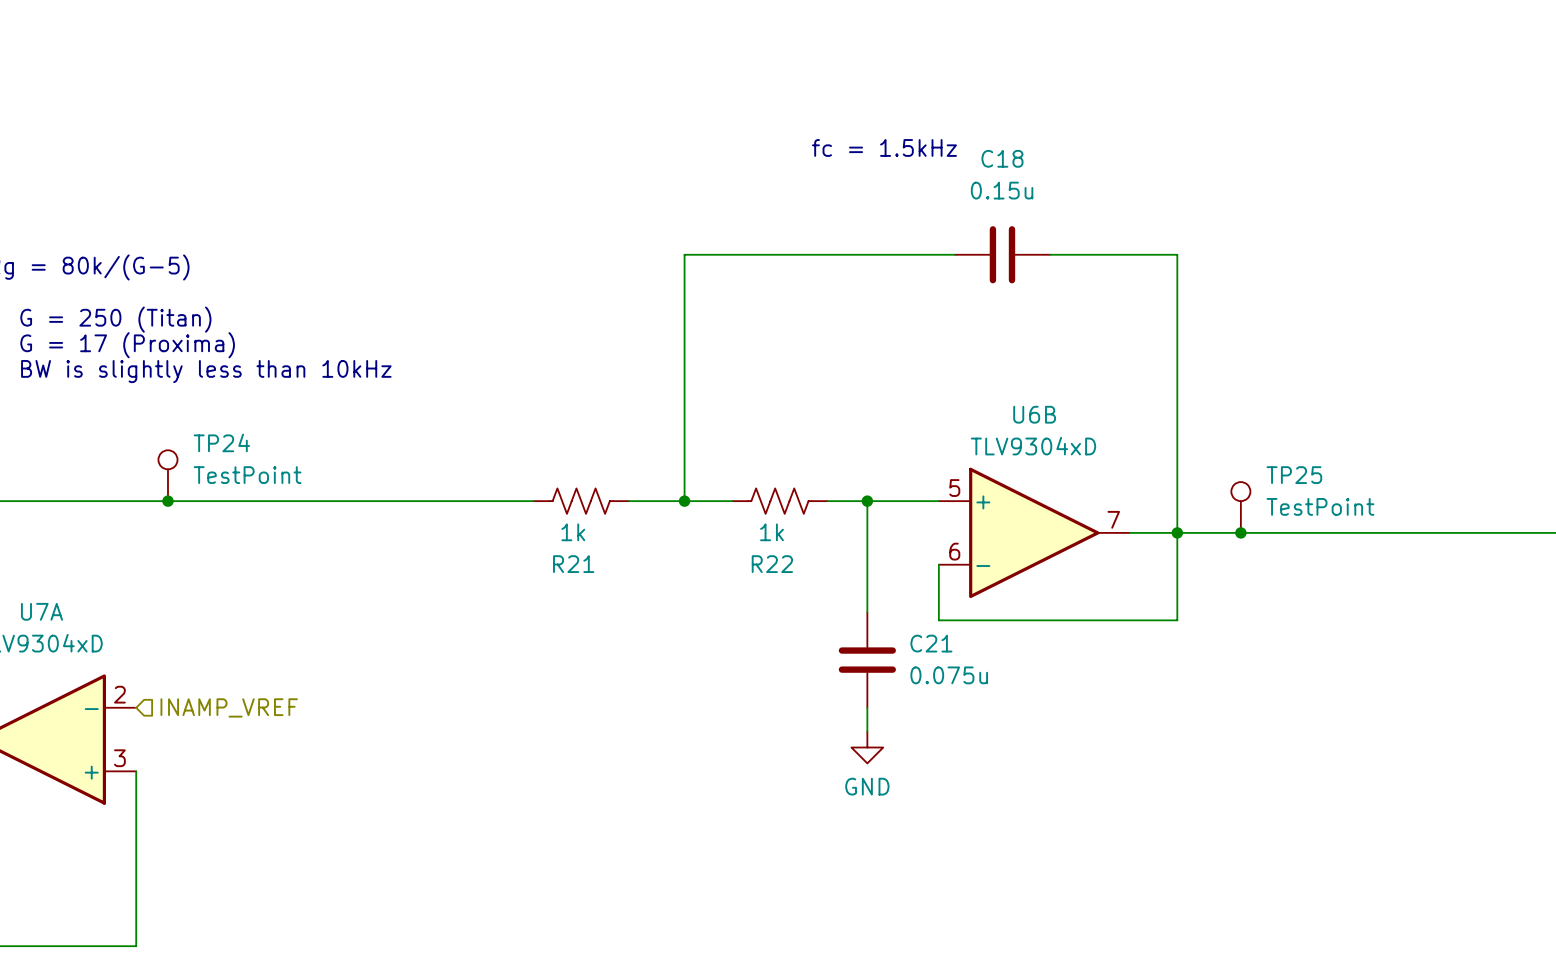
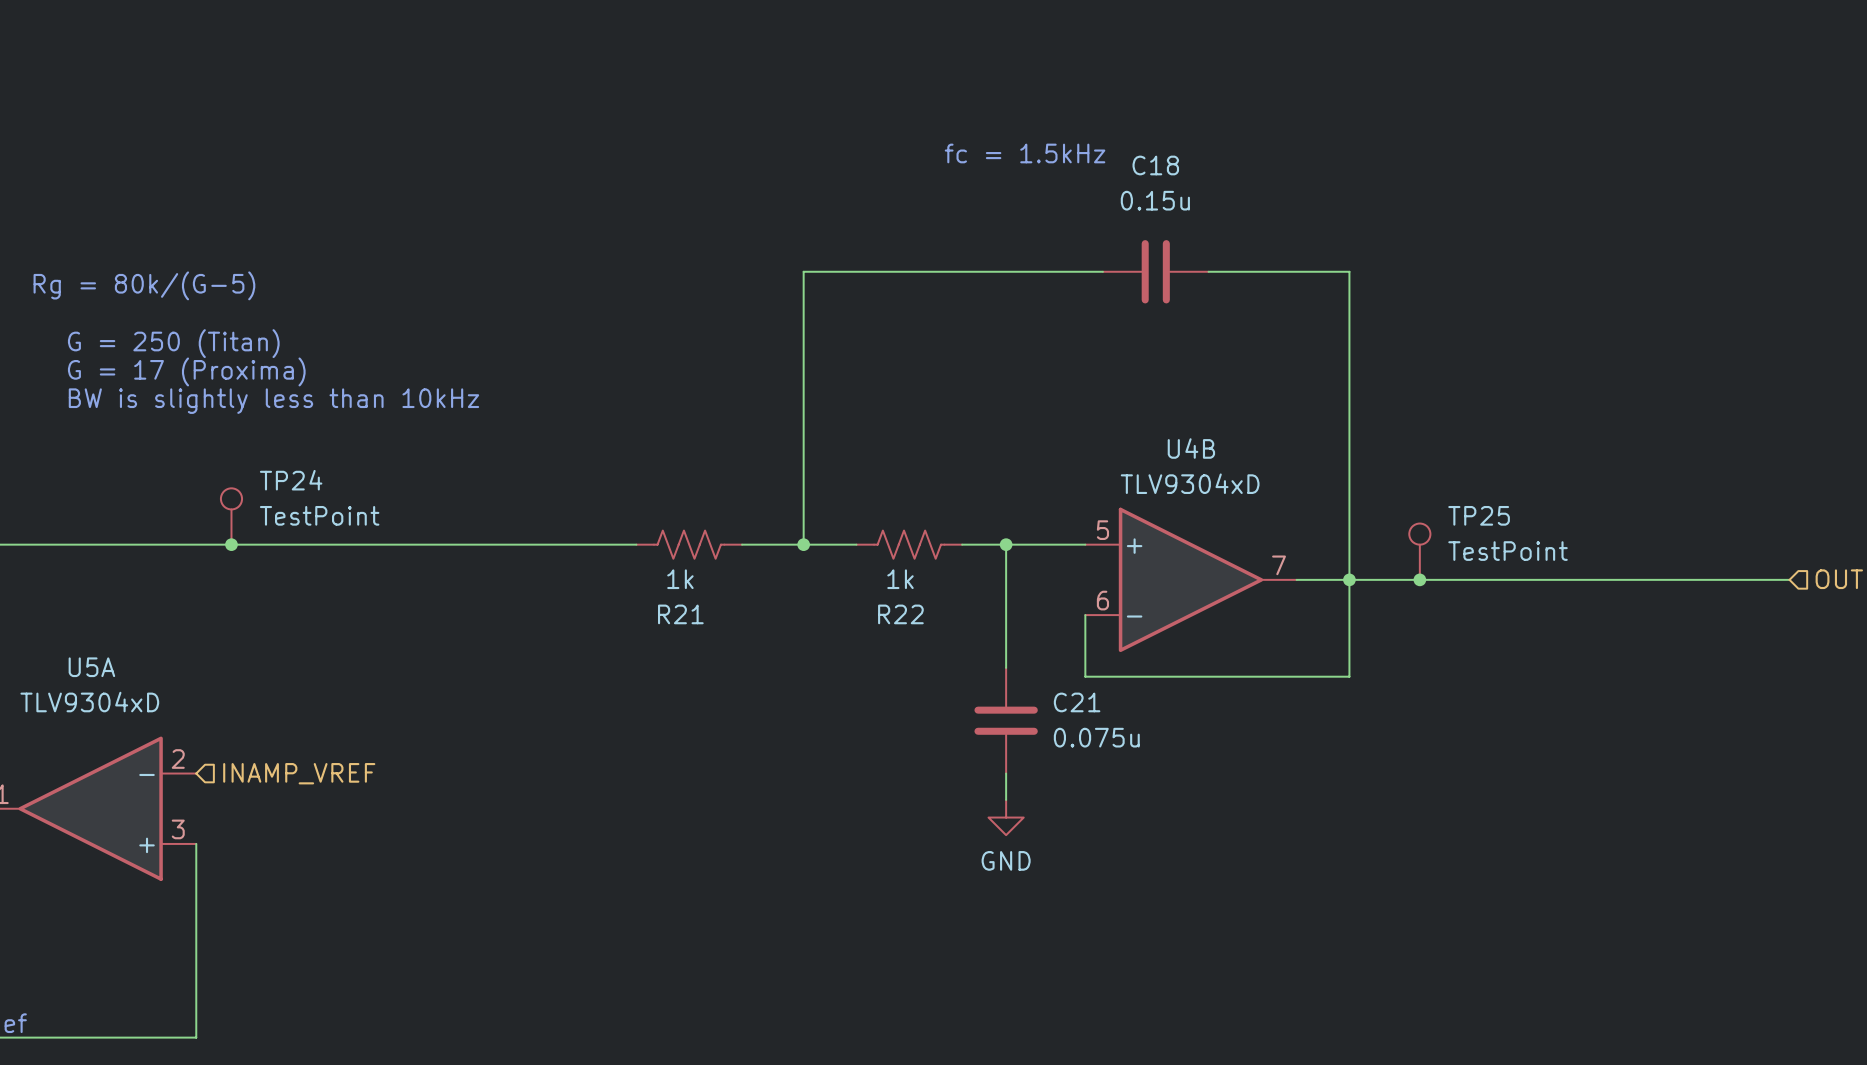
U6B name: U6B (1034, 414) -> U4B (1191, 448)
U7A name: U7A (41, 611) -> U5A (91, 667)

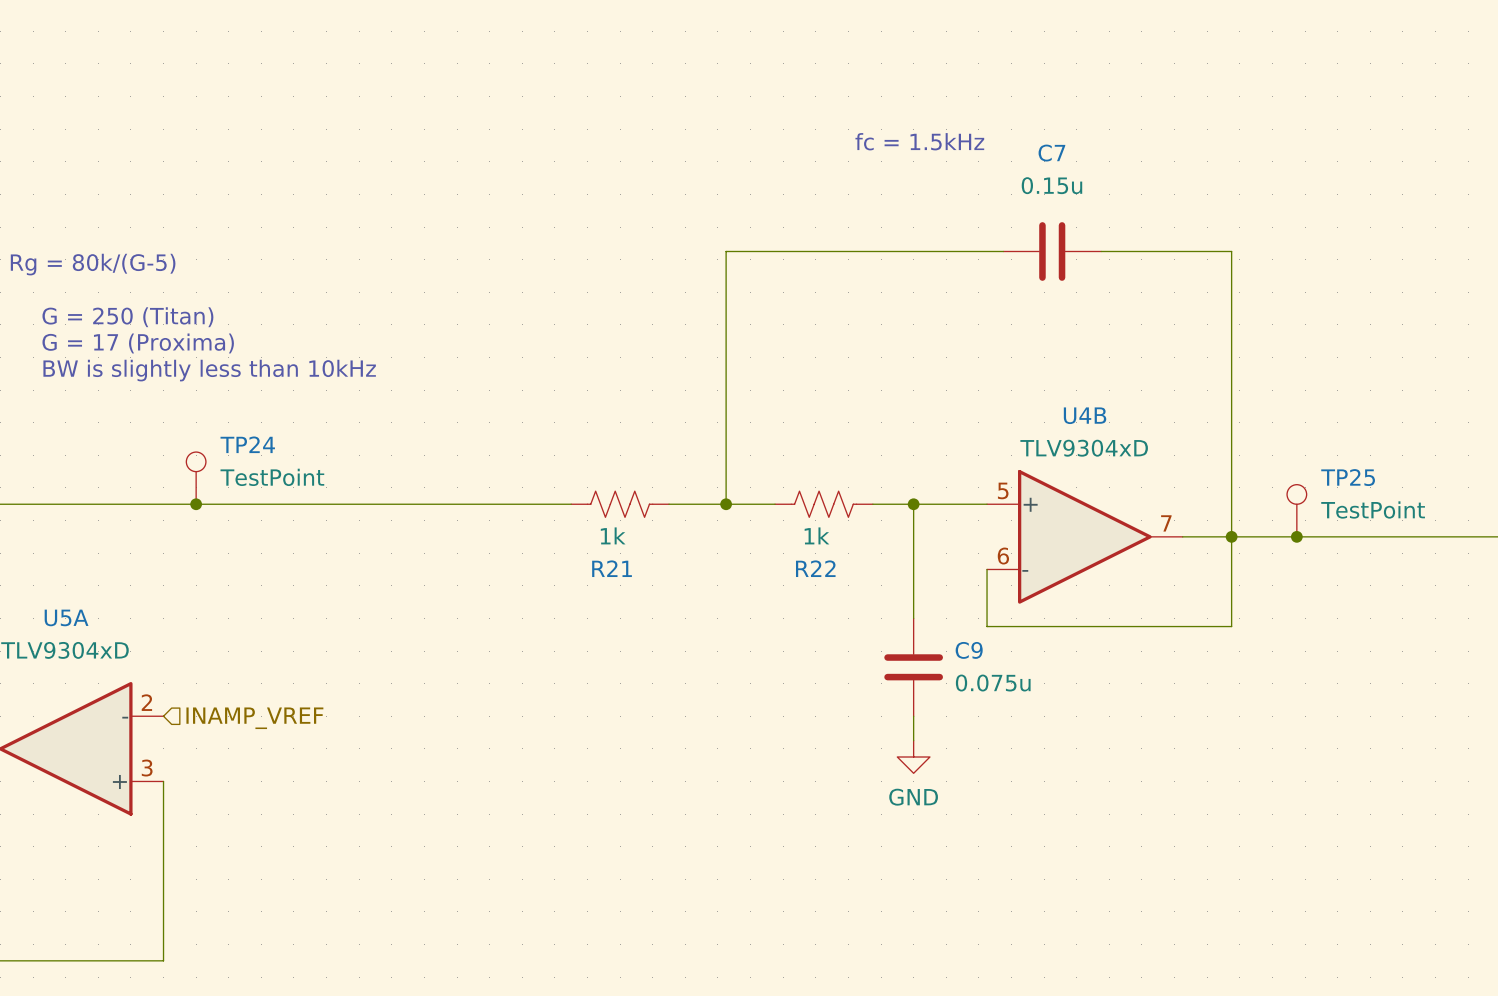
C18 name: C18 (1155, 165) -> C7 (1051, 153)
C21 name: C21 (1077, 702) -> C9 (969, 650)

